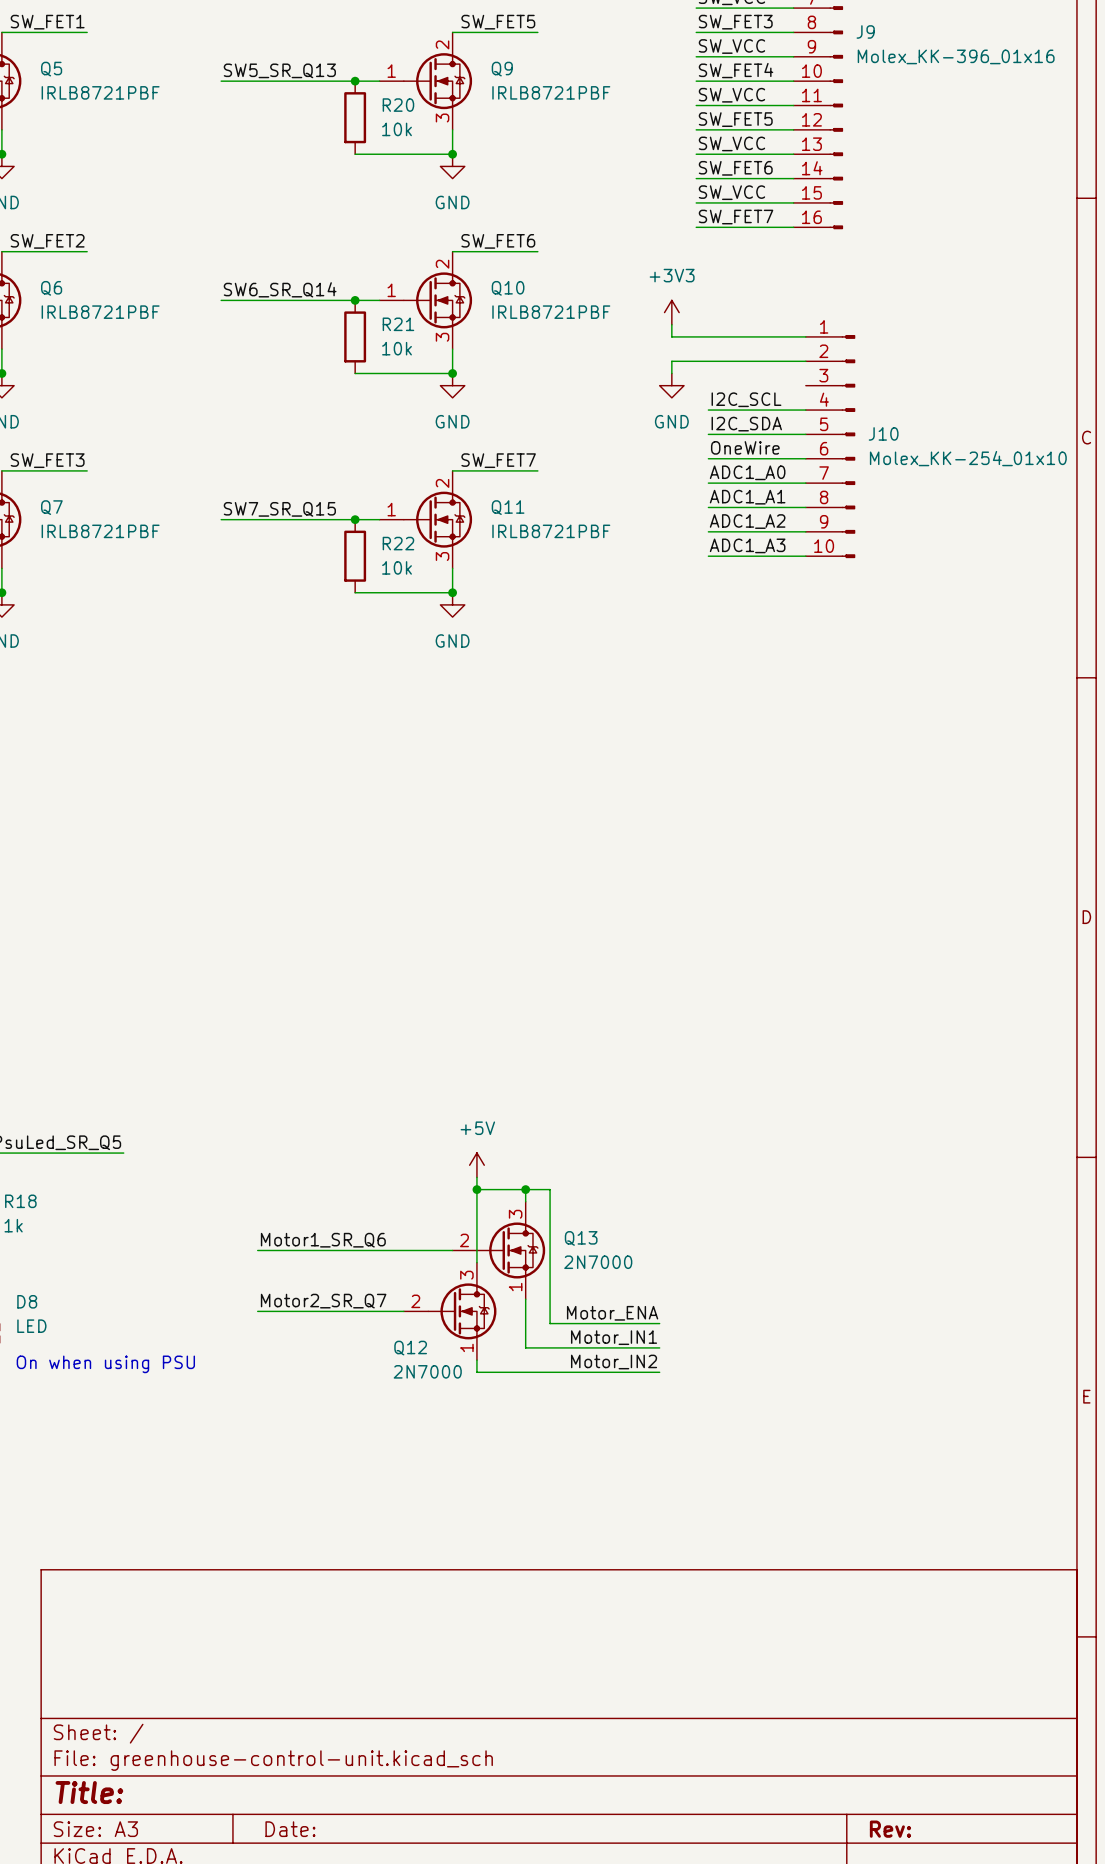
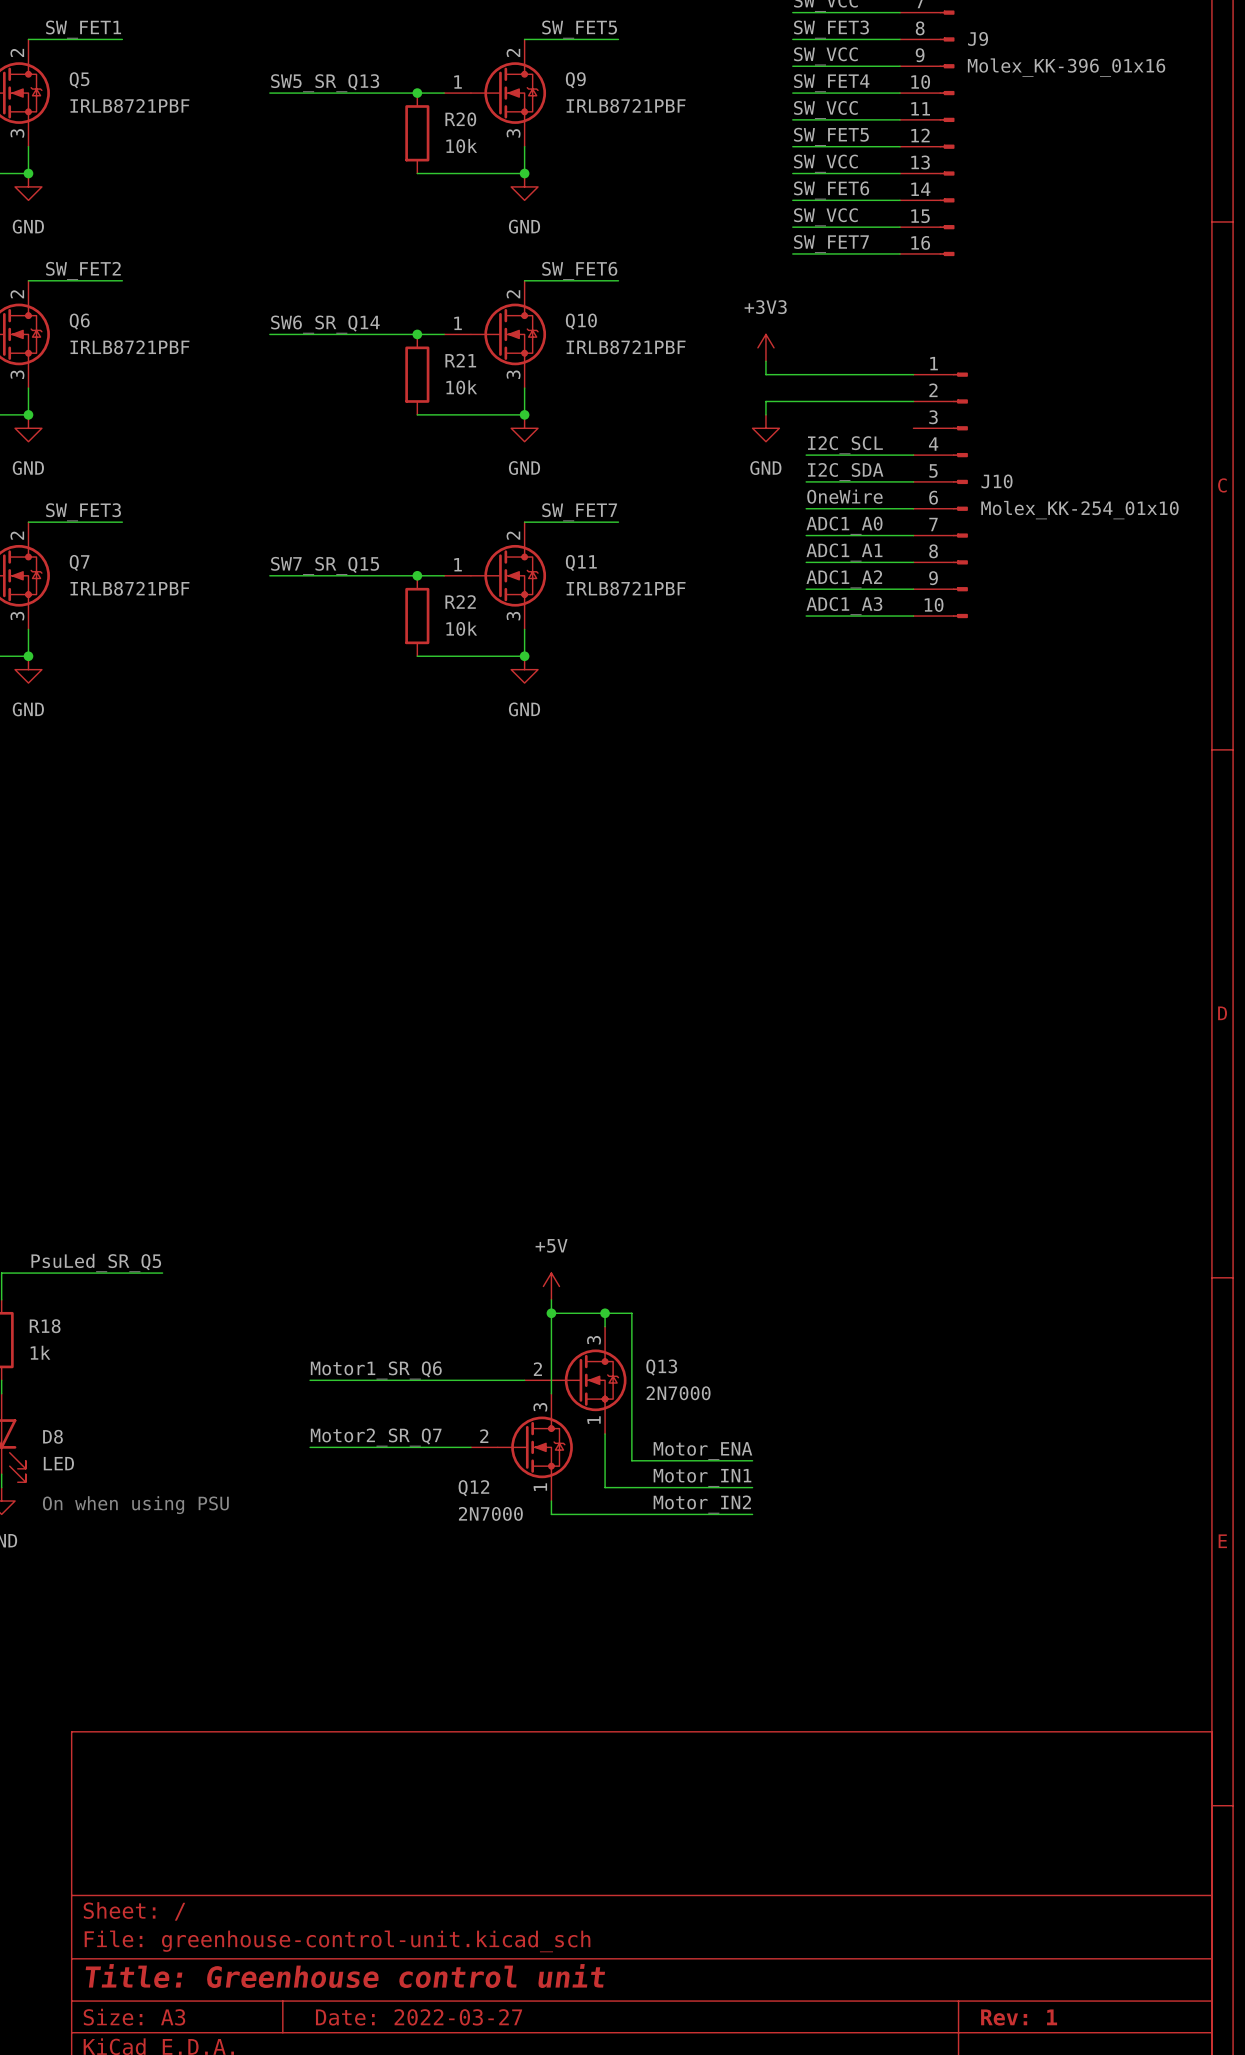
title block: Title: (89, 1792) -> Title: Greenhouse control unit (345, 1976)
title block: Date: (290, 1829) -> Date: 2022-03-27 (419, 2017)
title block: Rev: (890, 1829) -> Rev: 1 (1019, 2017)

